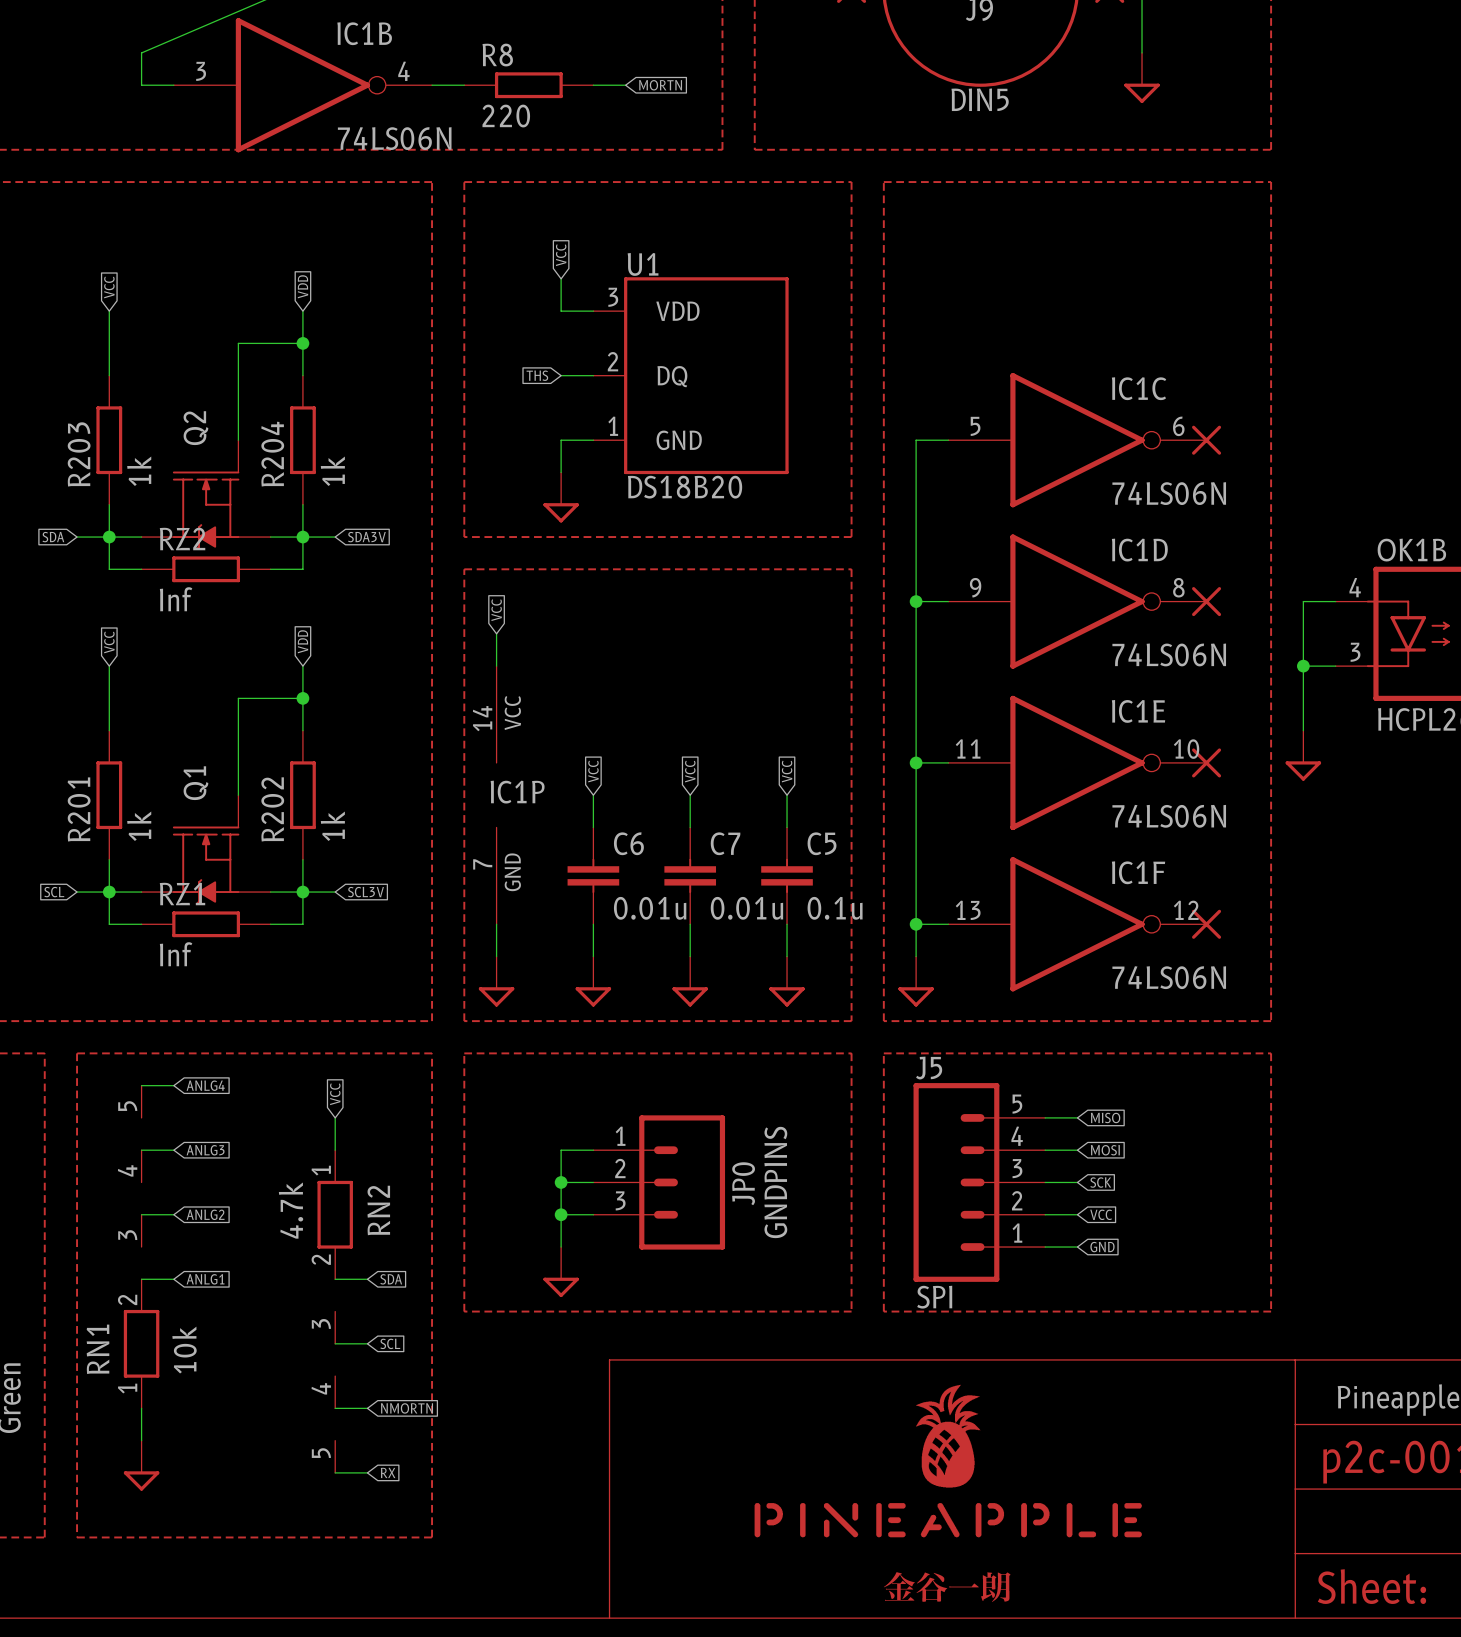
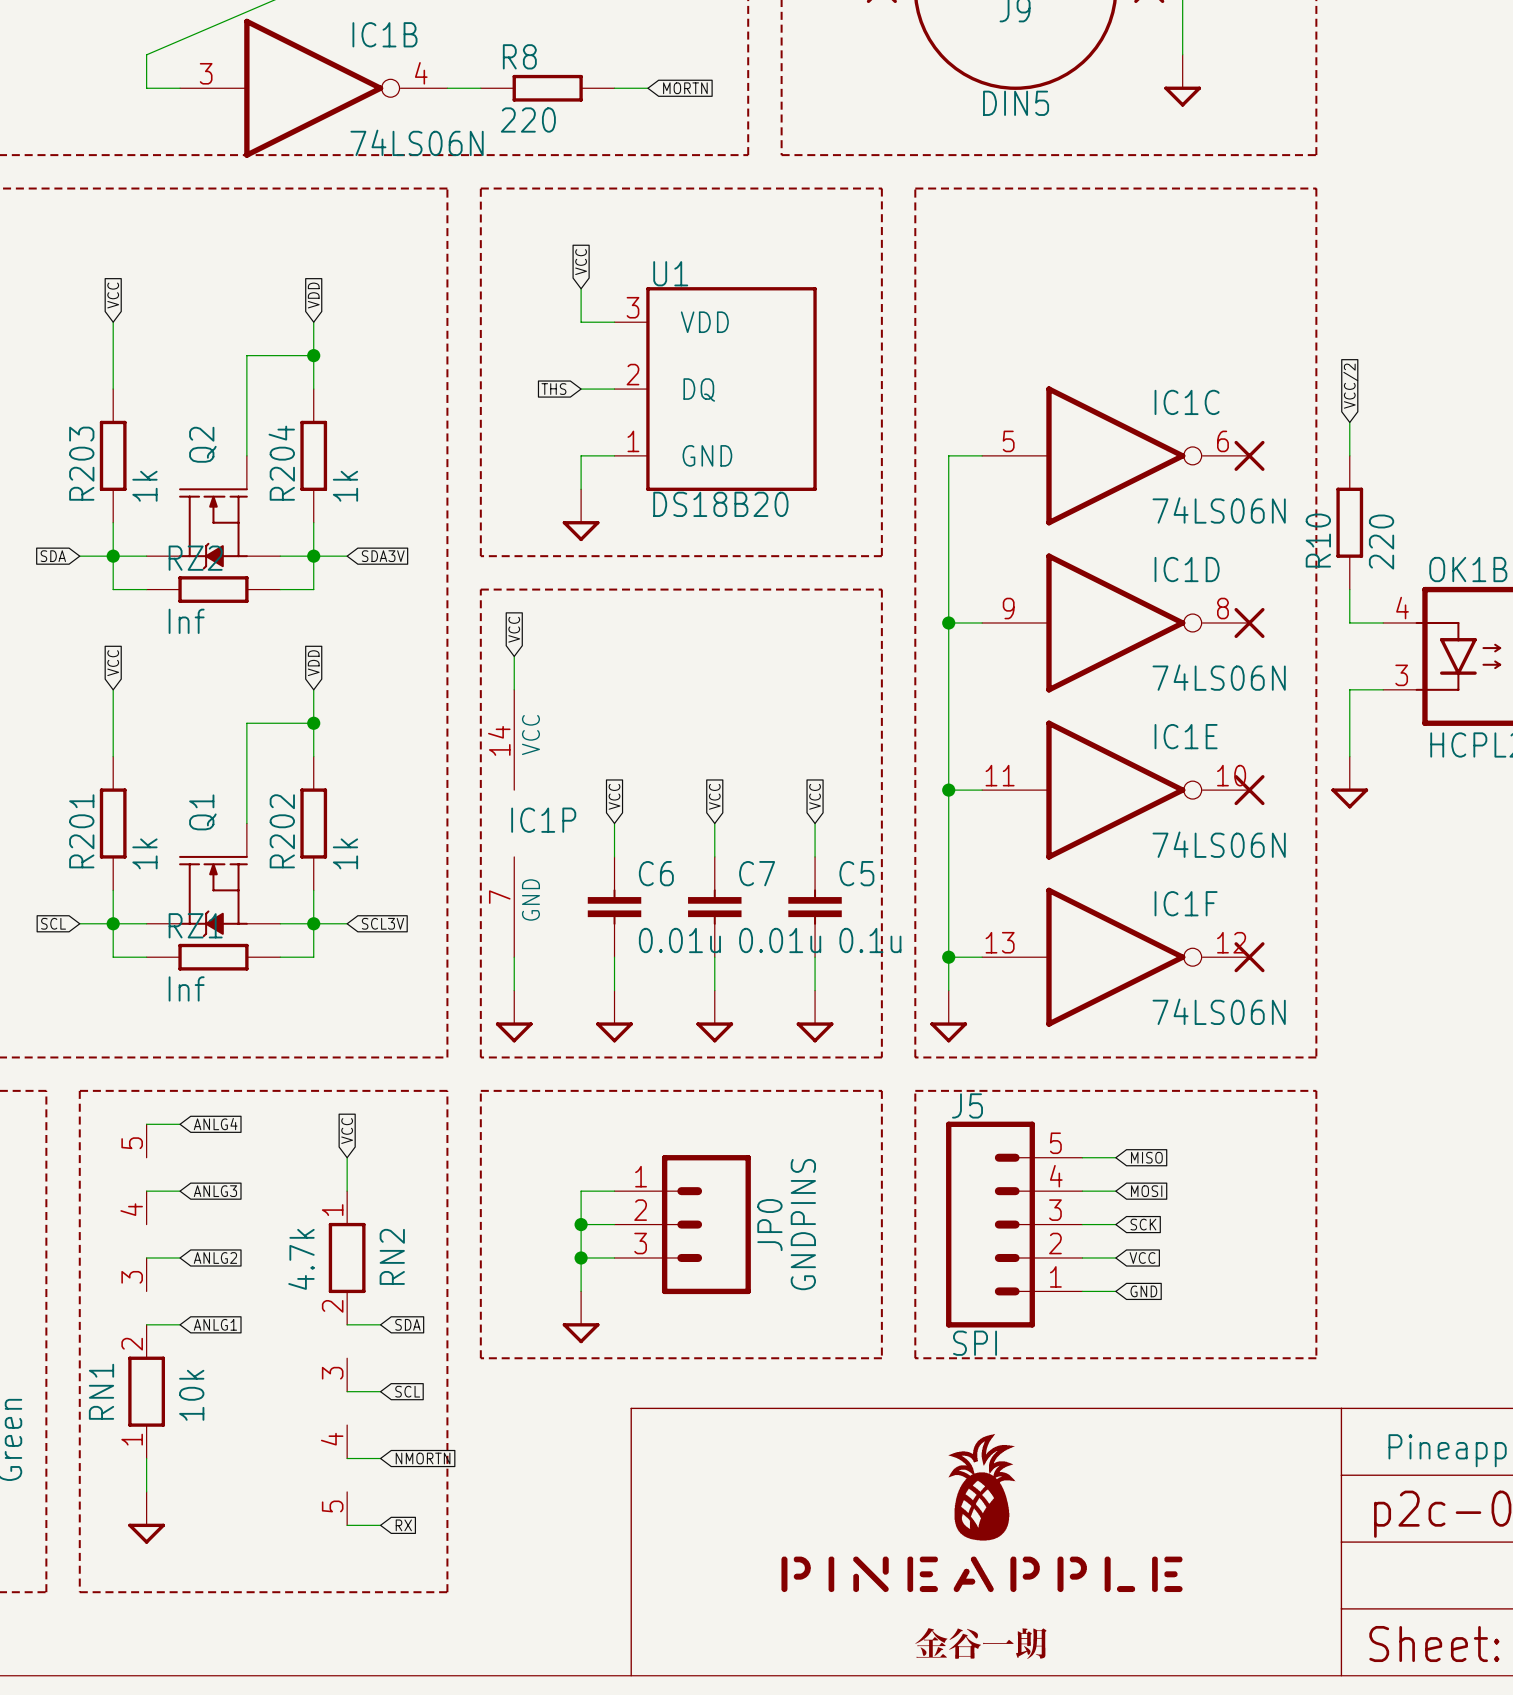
global label: none -> VCC/2 (1350, 386)
wire: none -> (1349, 422) (1349, 455)
R10: none -> 220 (1349, 522)
wire: (1303, 601) (1303, 666) -> (1349, 622) (1349, 589)
junction: (1303, 666) -> none

